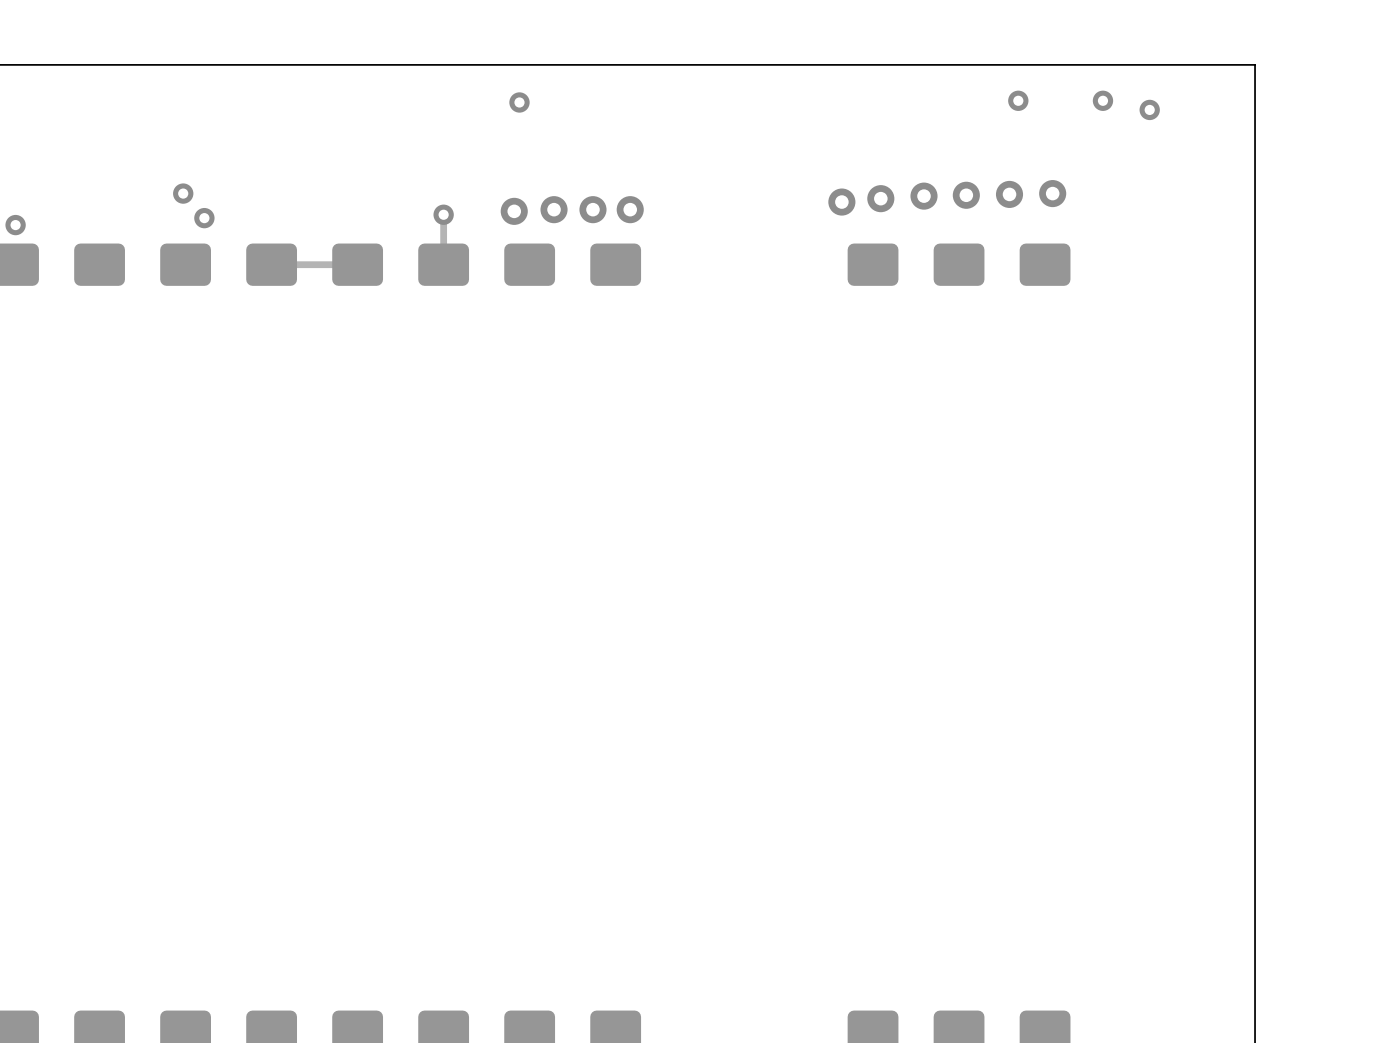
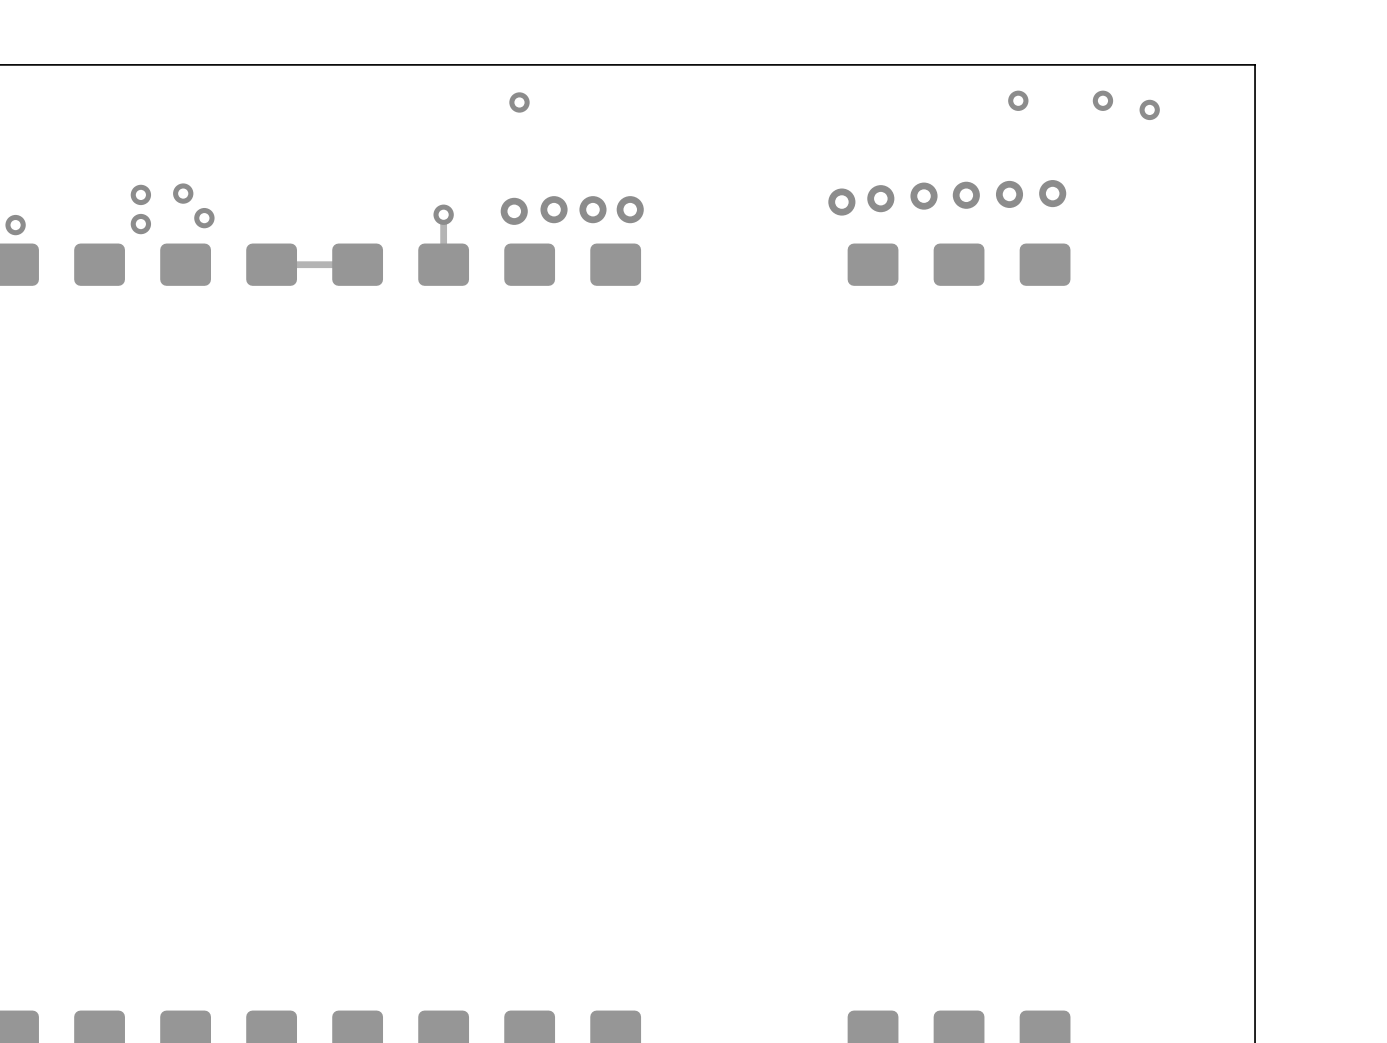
via: none -> (140, 194)
via: none -> (140, 224)

